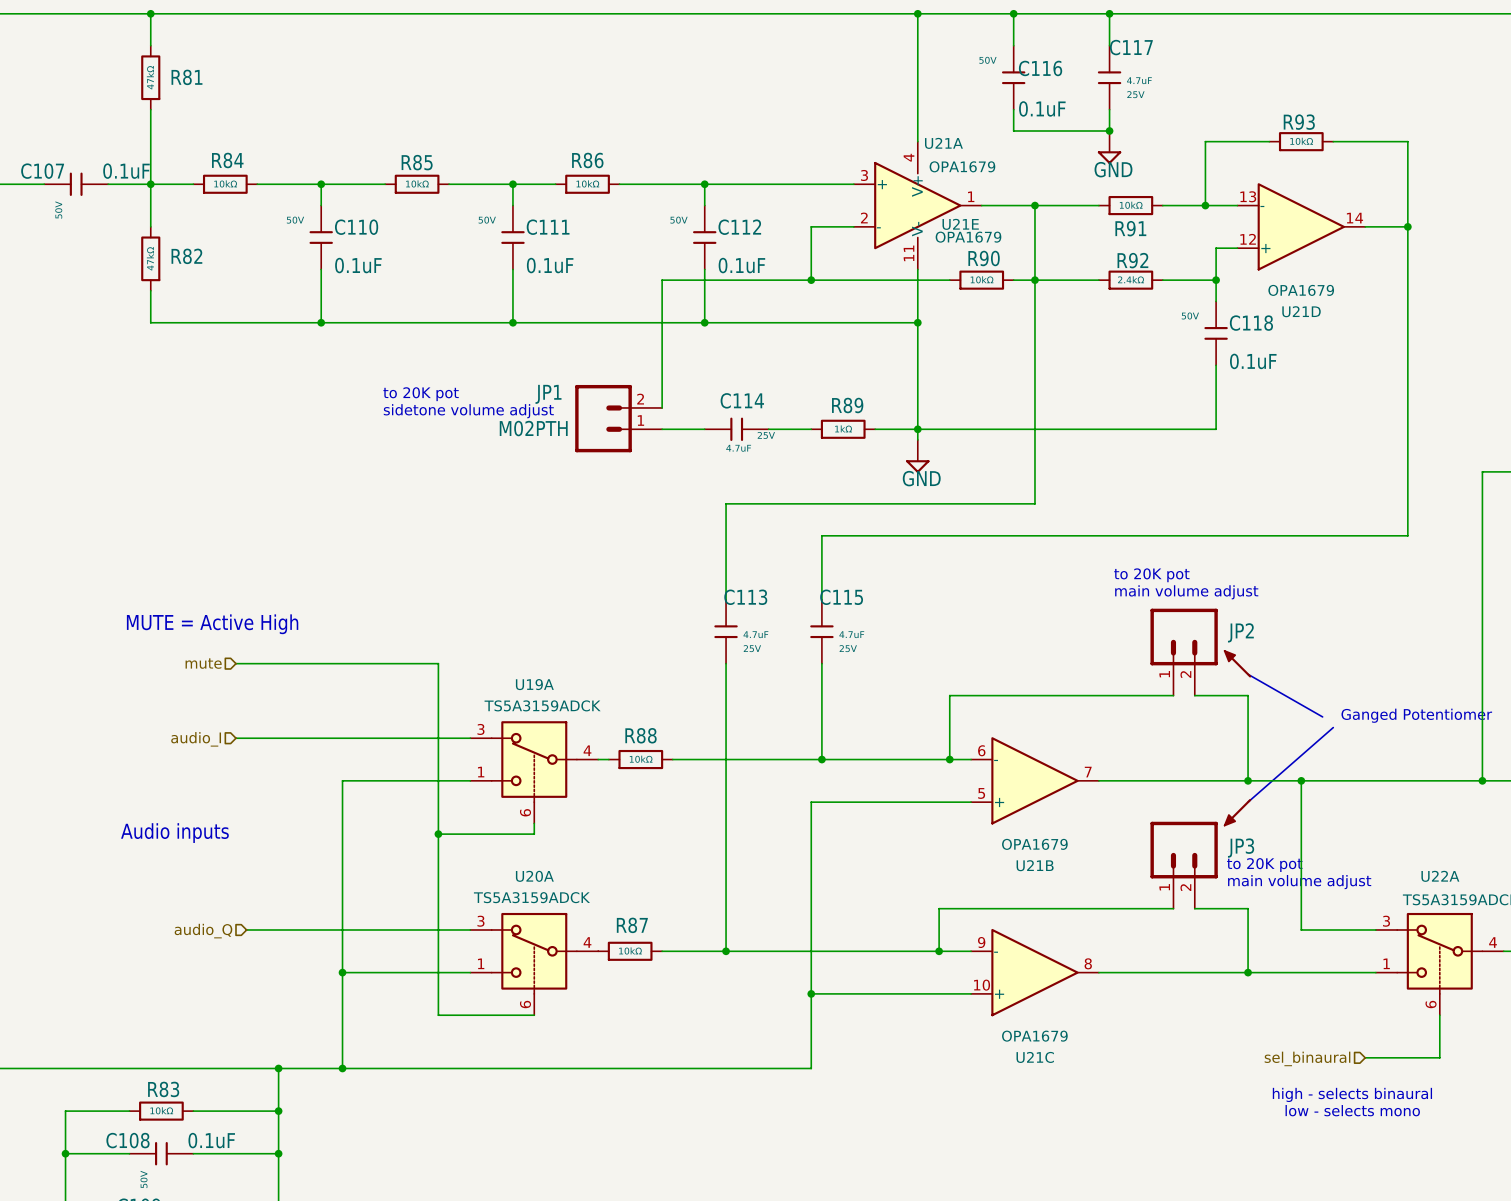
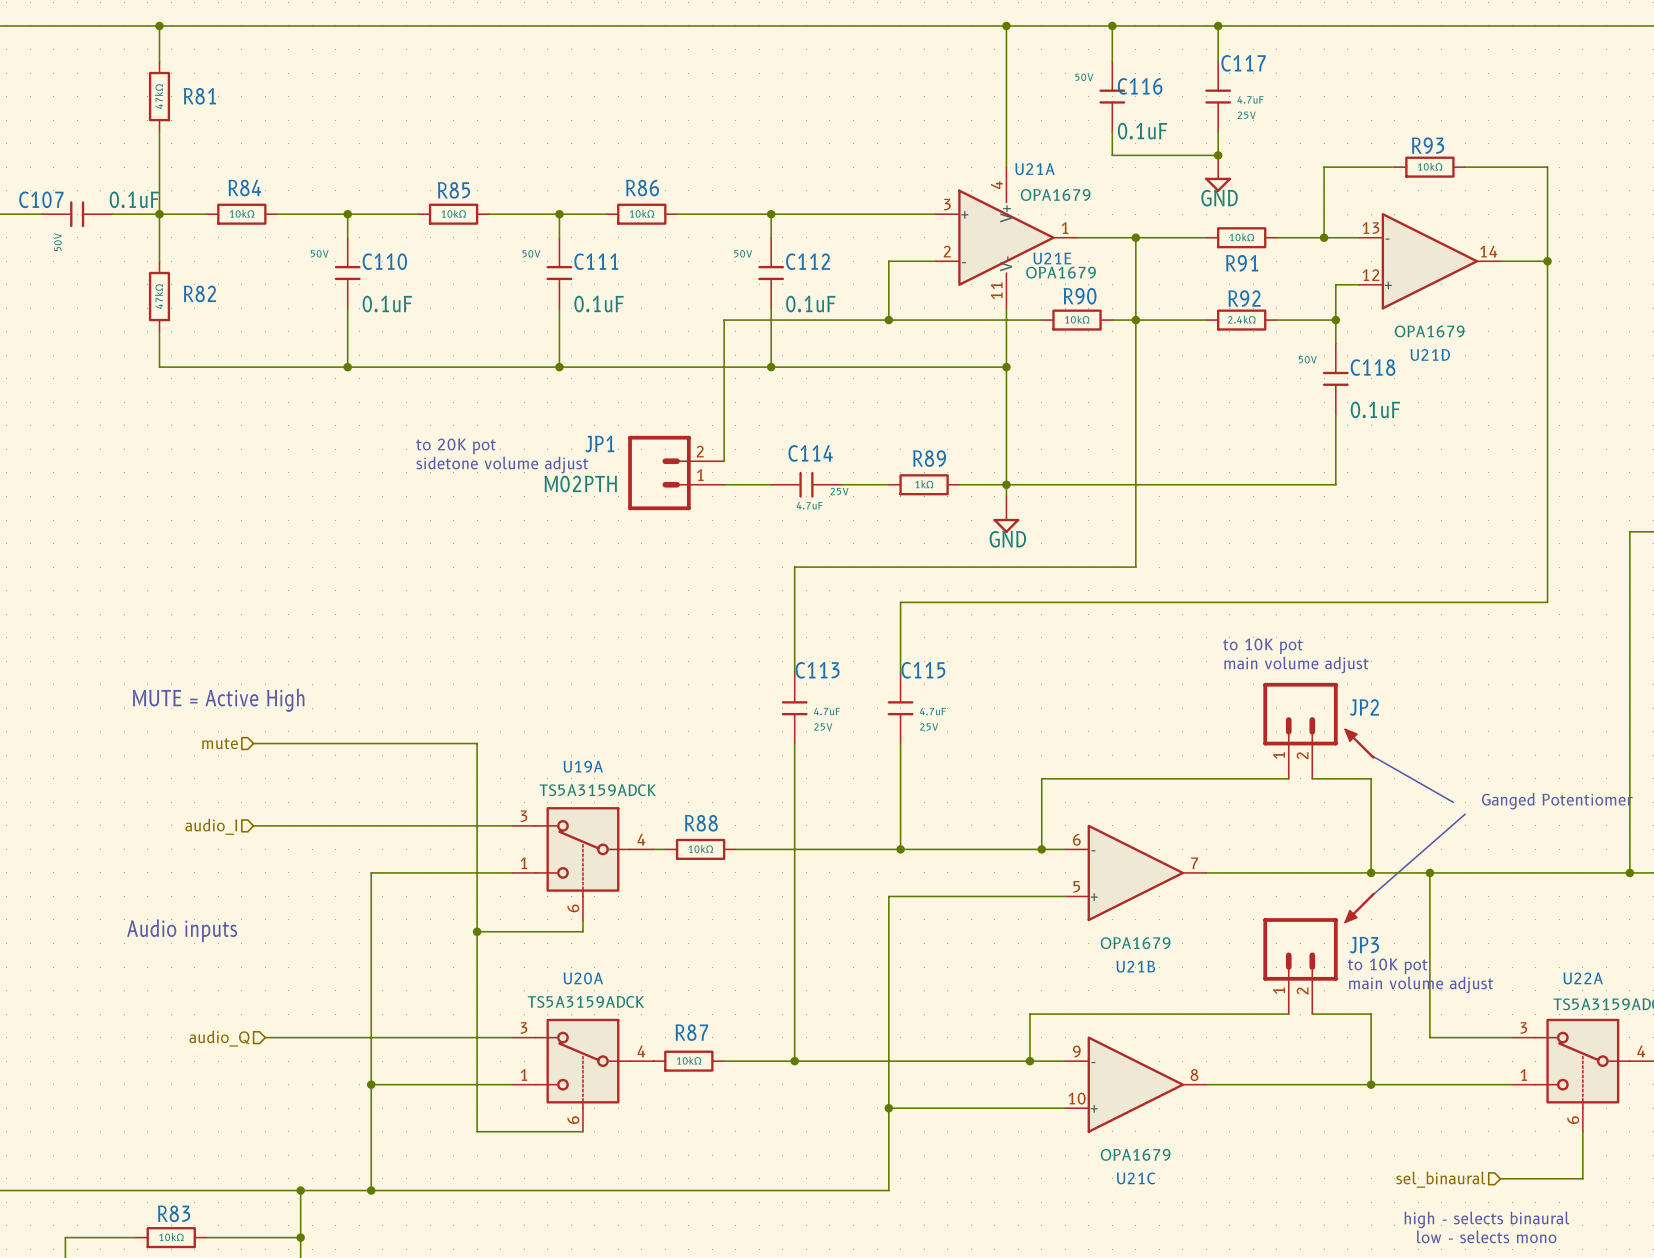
text: to 20K pot (1151, 575) -> to 10K pot (1263, 646)
text: to 20K pot (1264, 865) -> to 10K pot (1387, 966)

